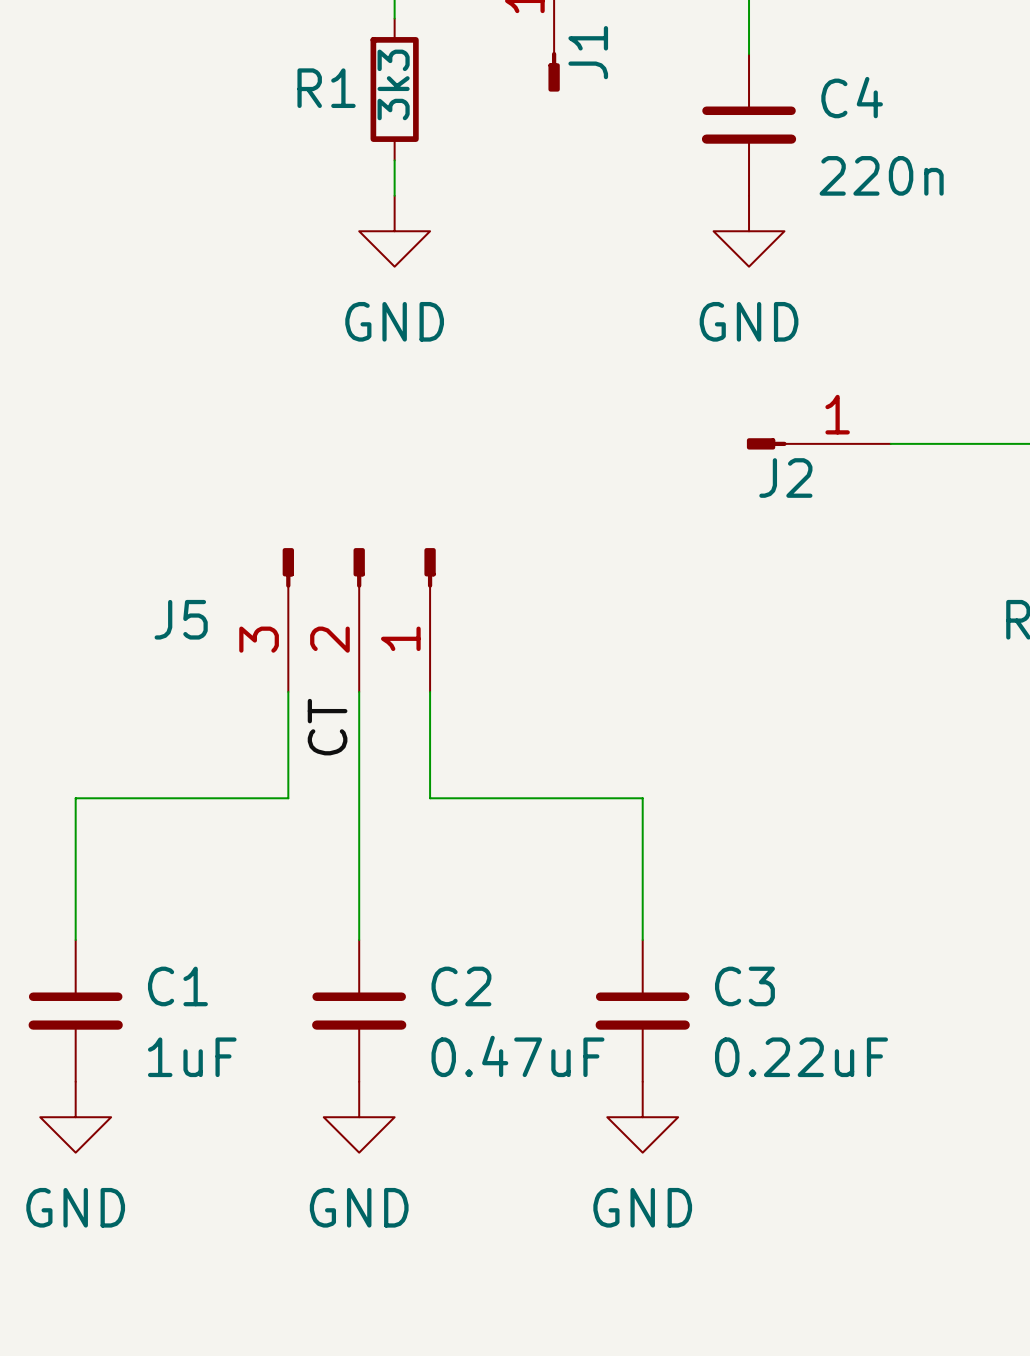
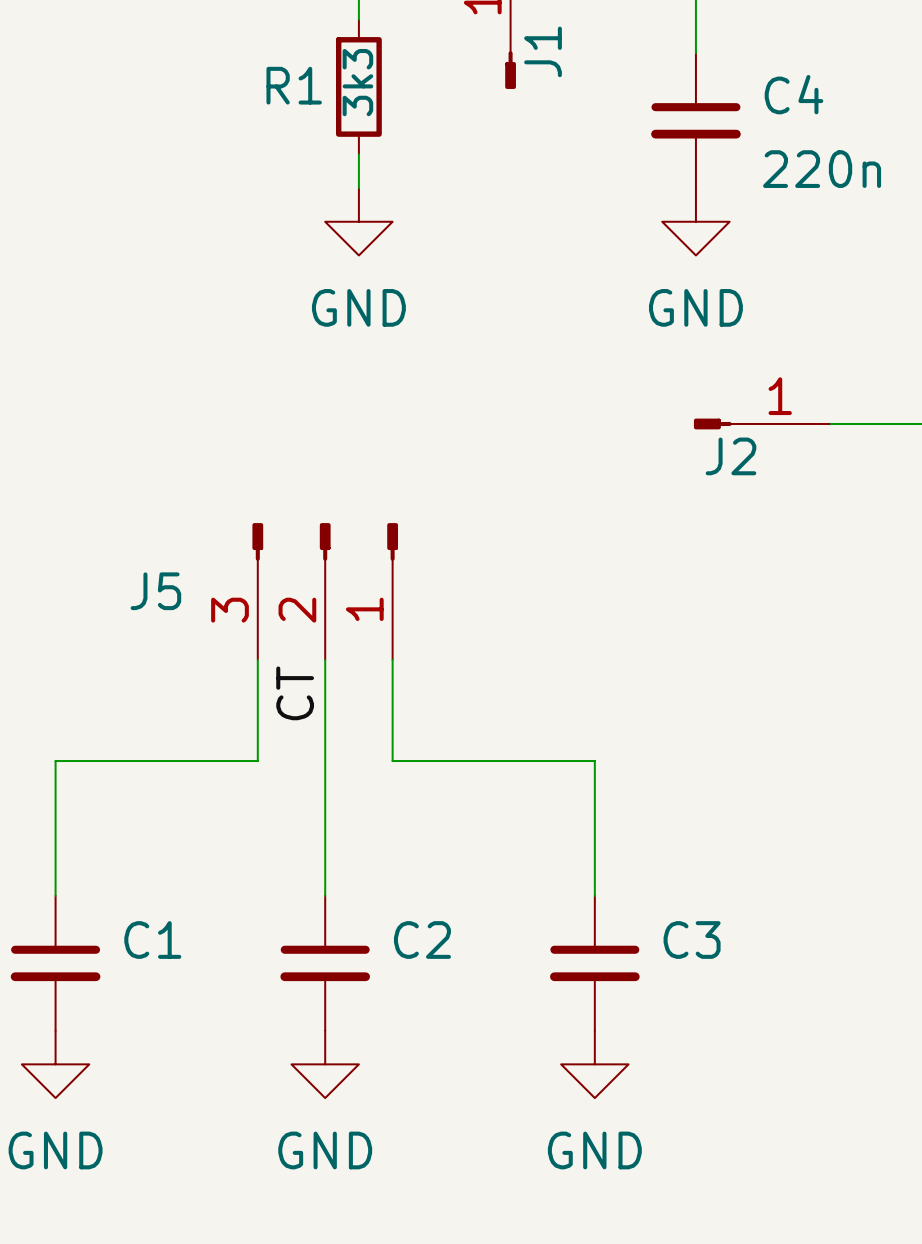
C2 value: 0.47uF (517, 1056) -> none
C1 value: 1uF (192, 1057) -> none
C3 value: 0.22uF (801, 1057) -> none

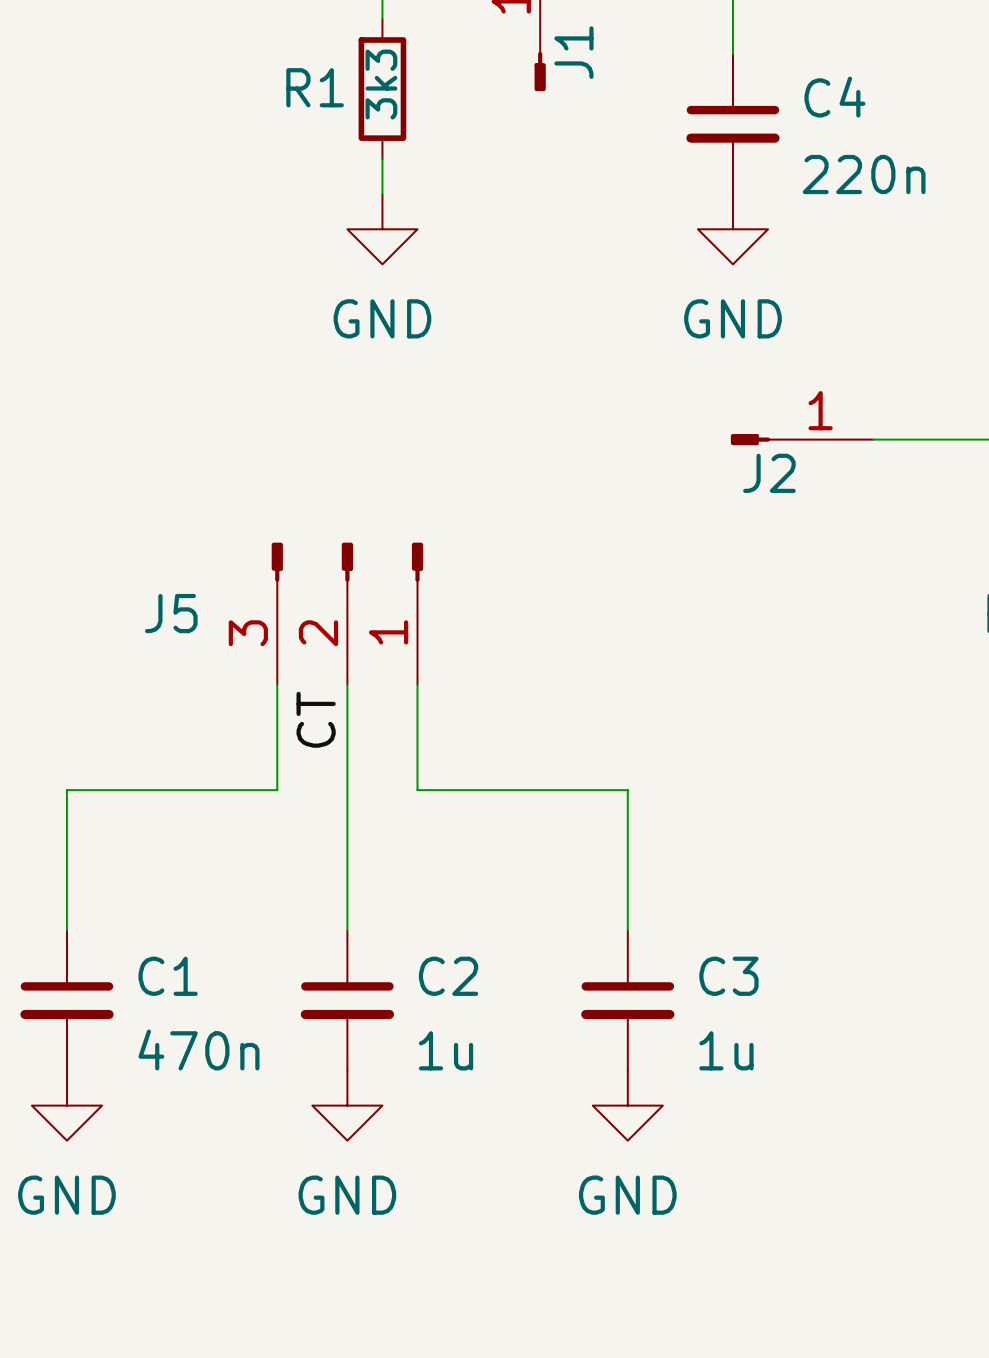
C1 value: none -> 470n (198, 1050)
C2 value: none -> 1u (446, 1050)
C3 value: none -> 1u (726, 1050)

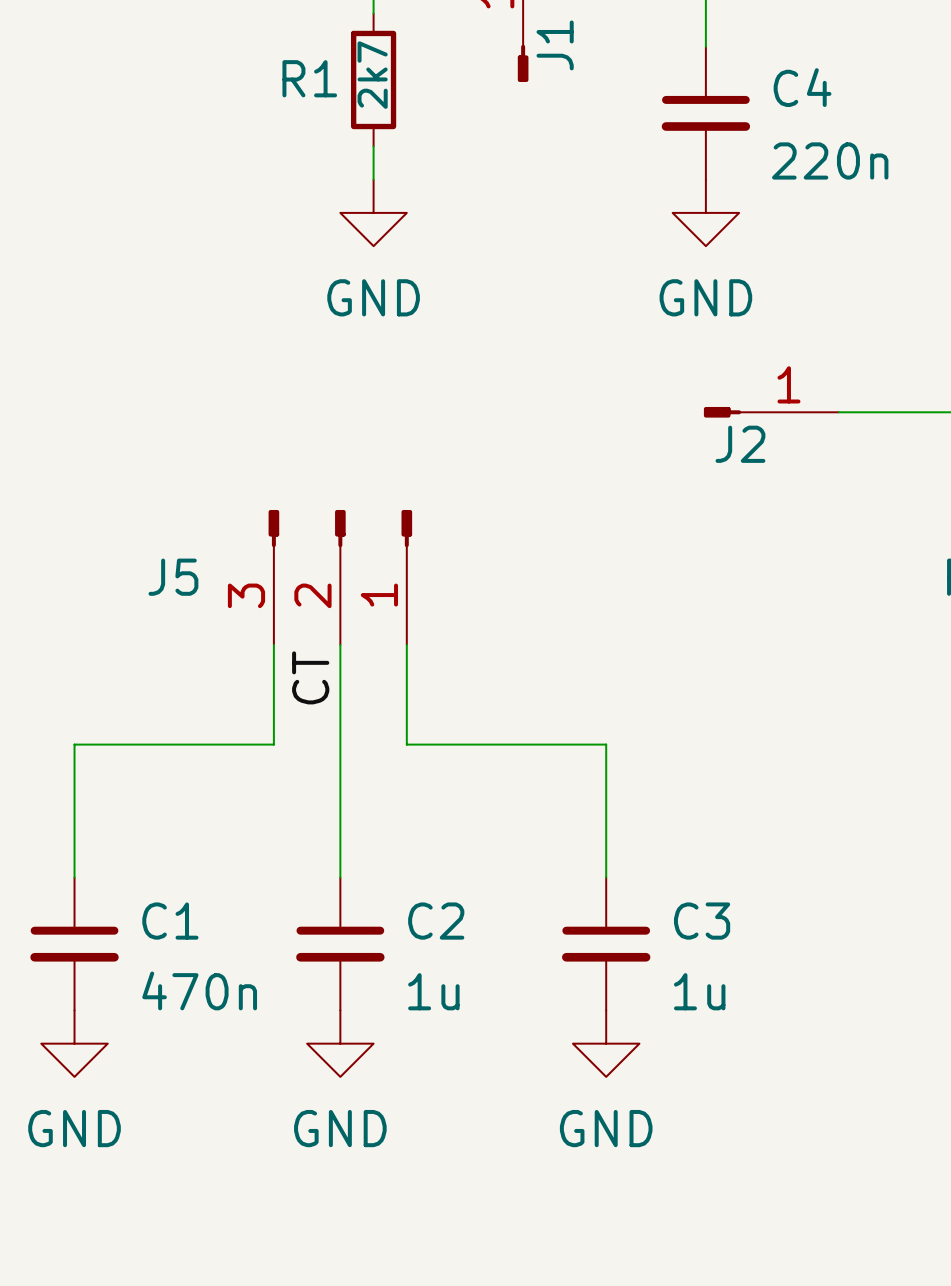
R1 value: 3k3 (381, 84) -> 2k7 (372, 75)

